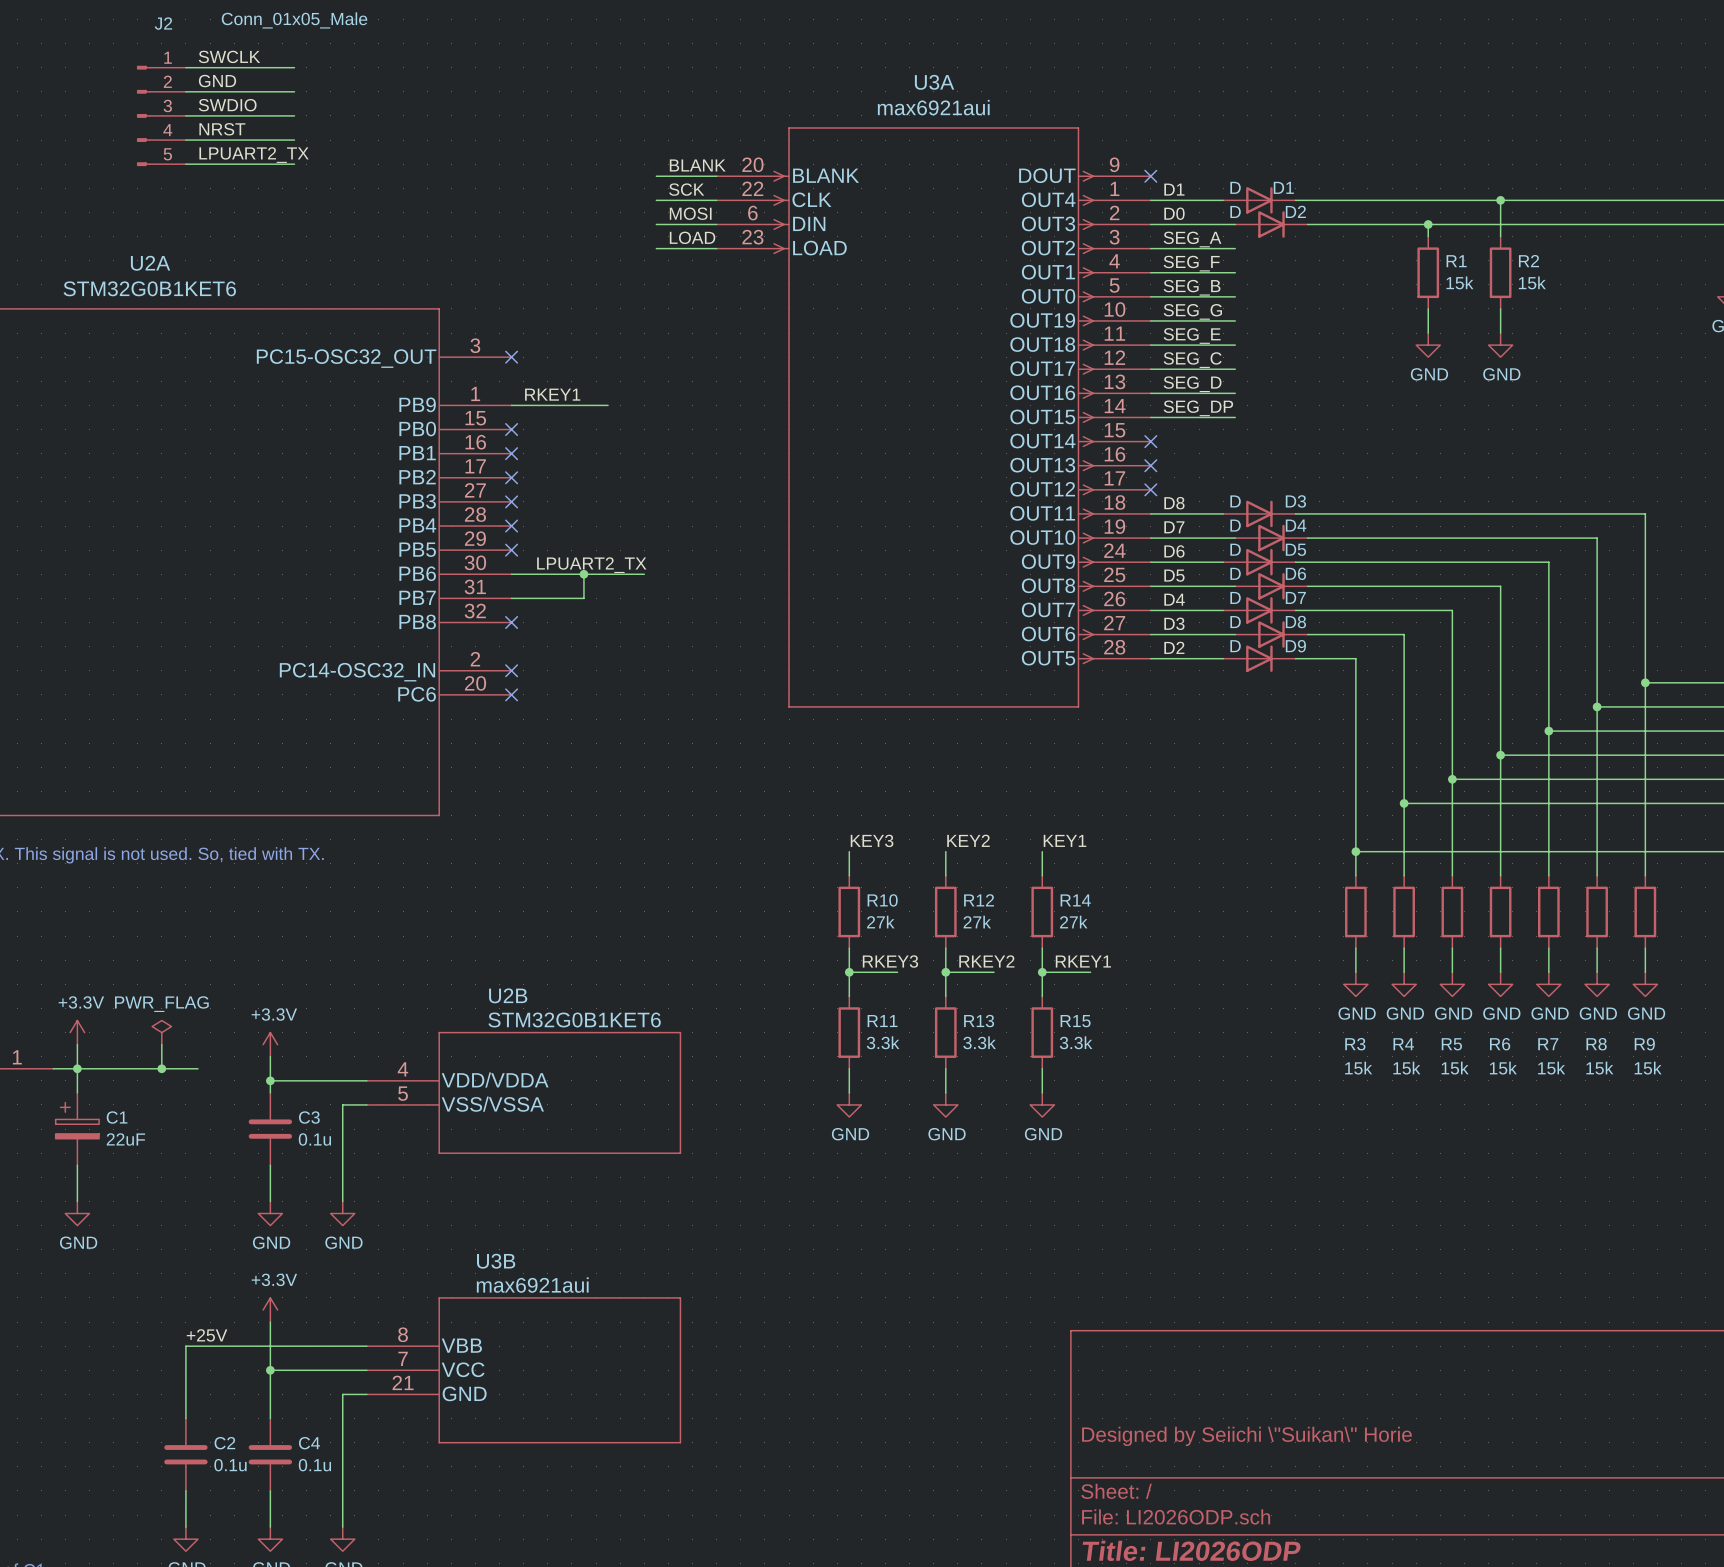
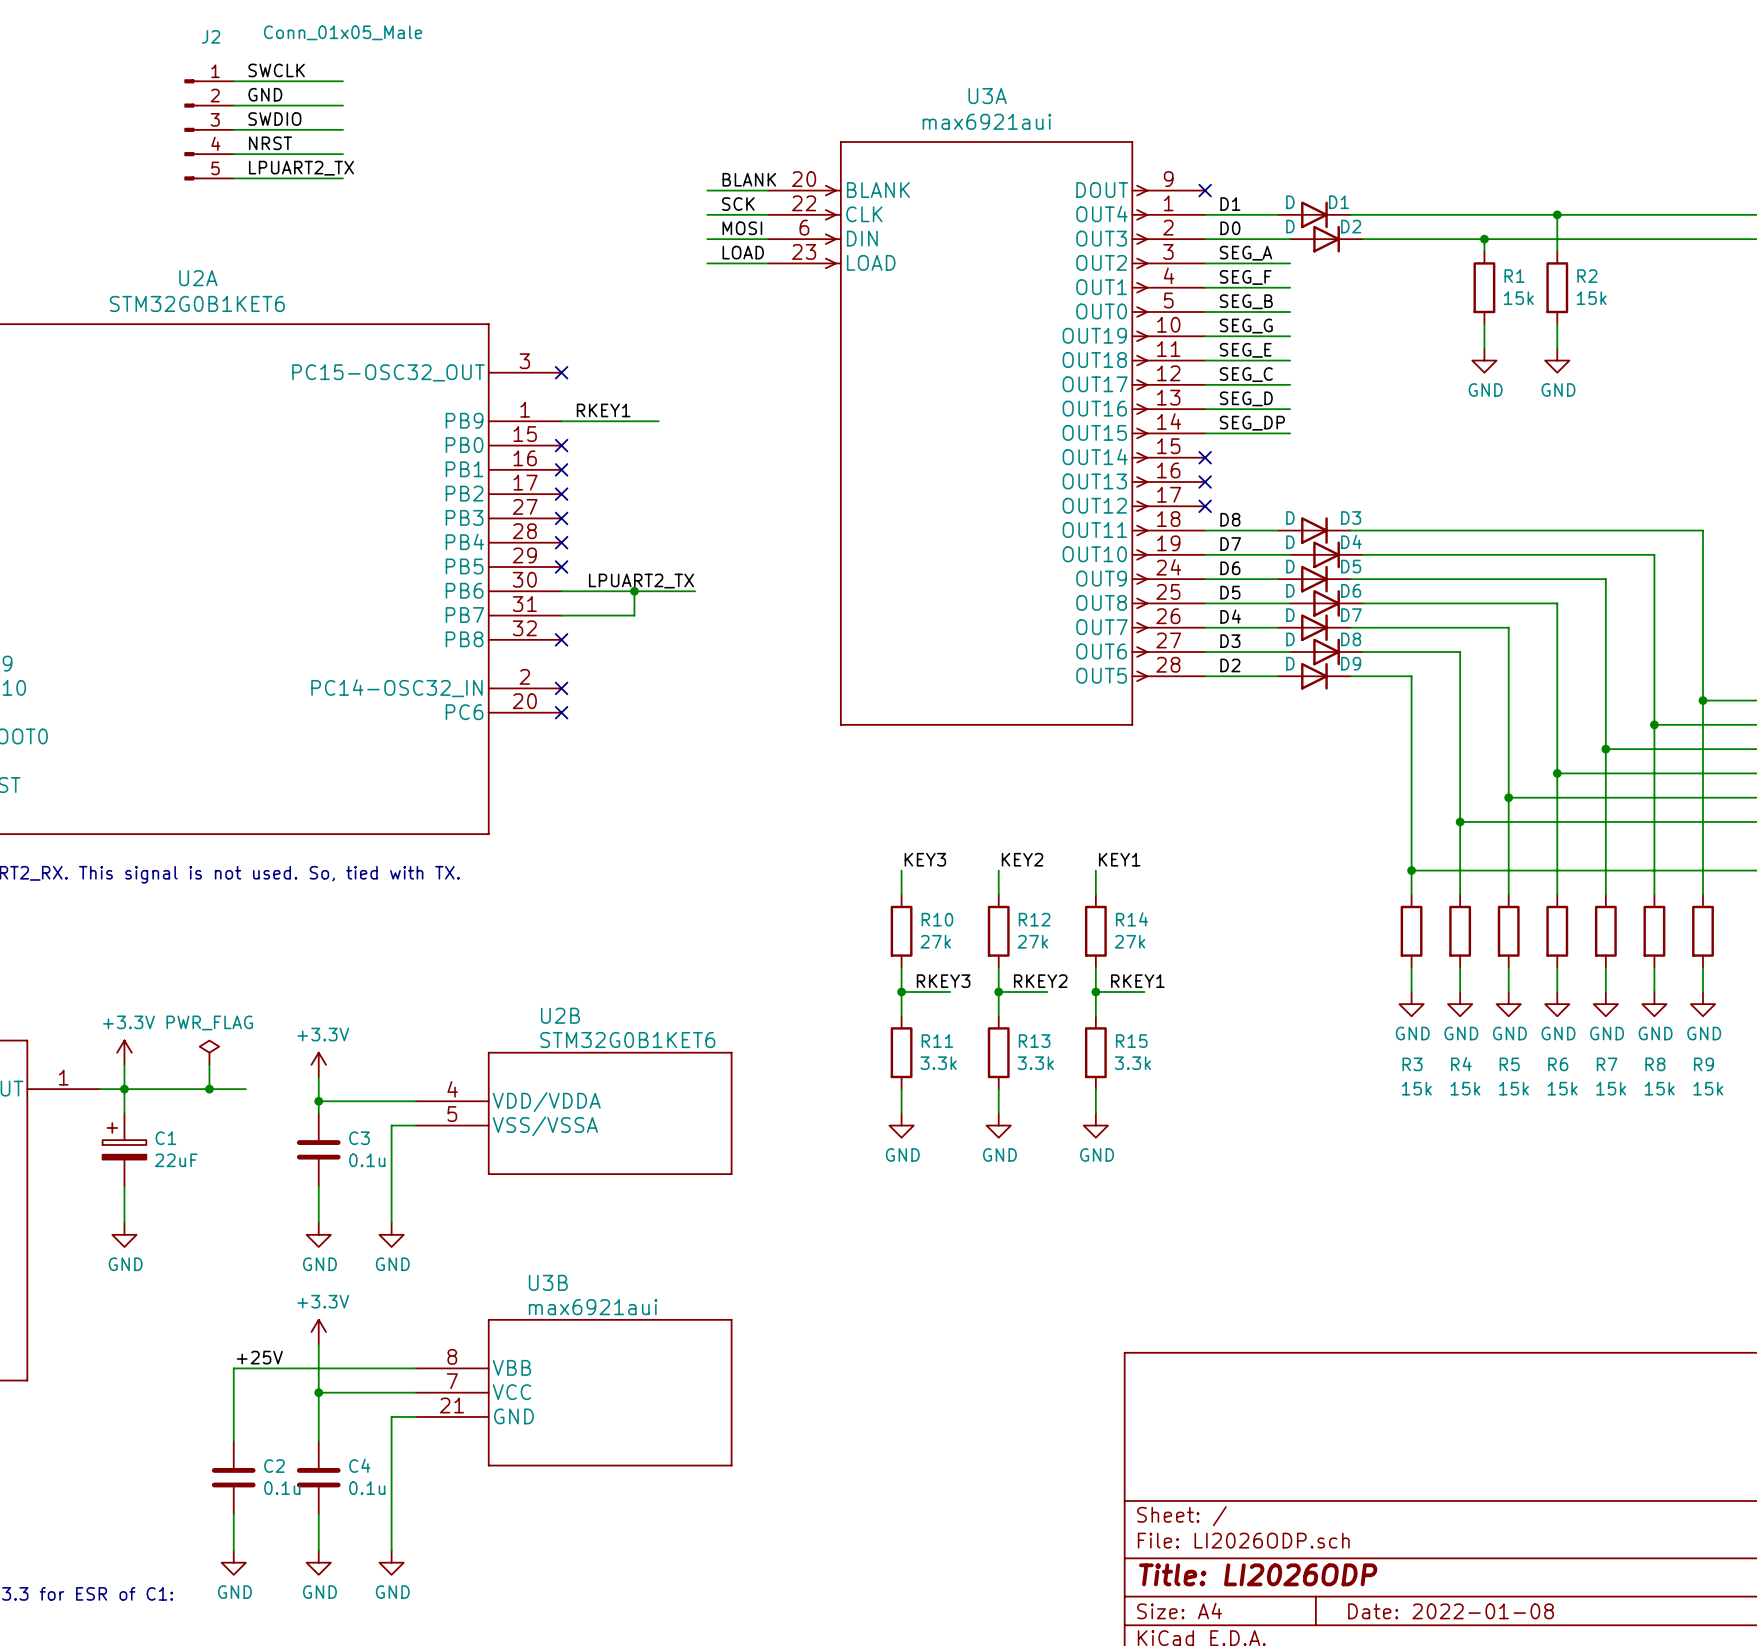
title block: Designed by Seiichi \"Suikan\" Horie (1246, 1436) -> none

